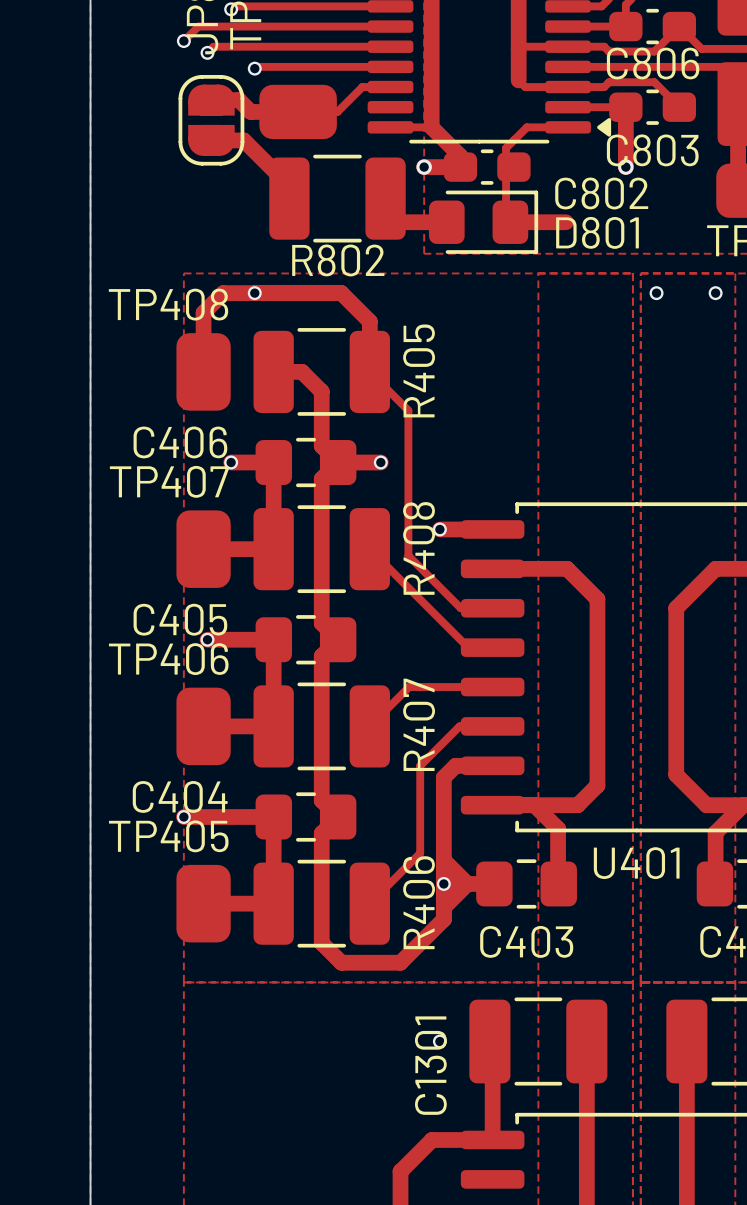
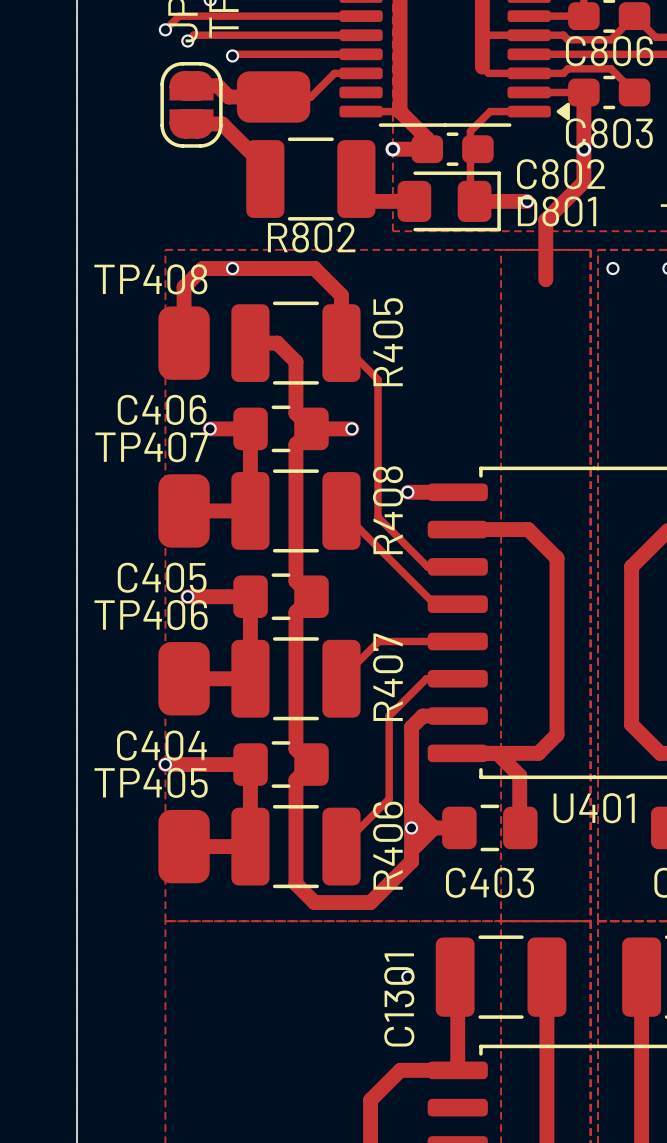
track: none -> (583, 149) (583, 181) (545, 220) (545, 279)
via: none -> (527, 201)

